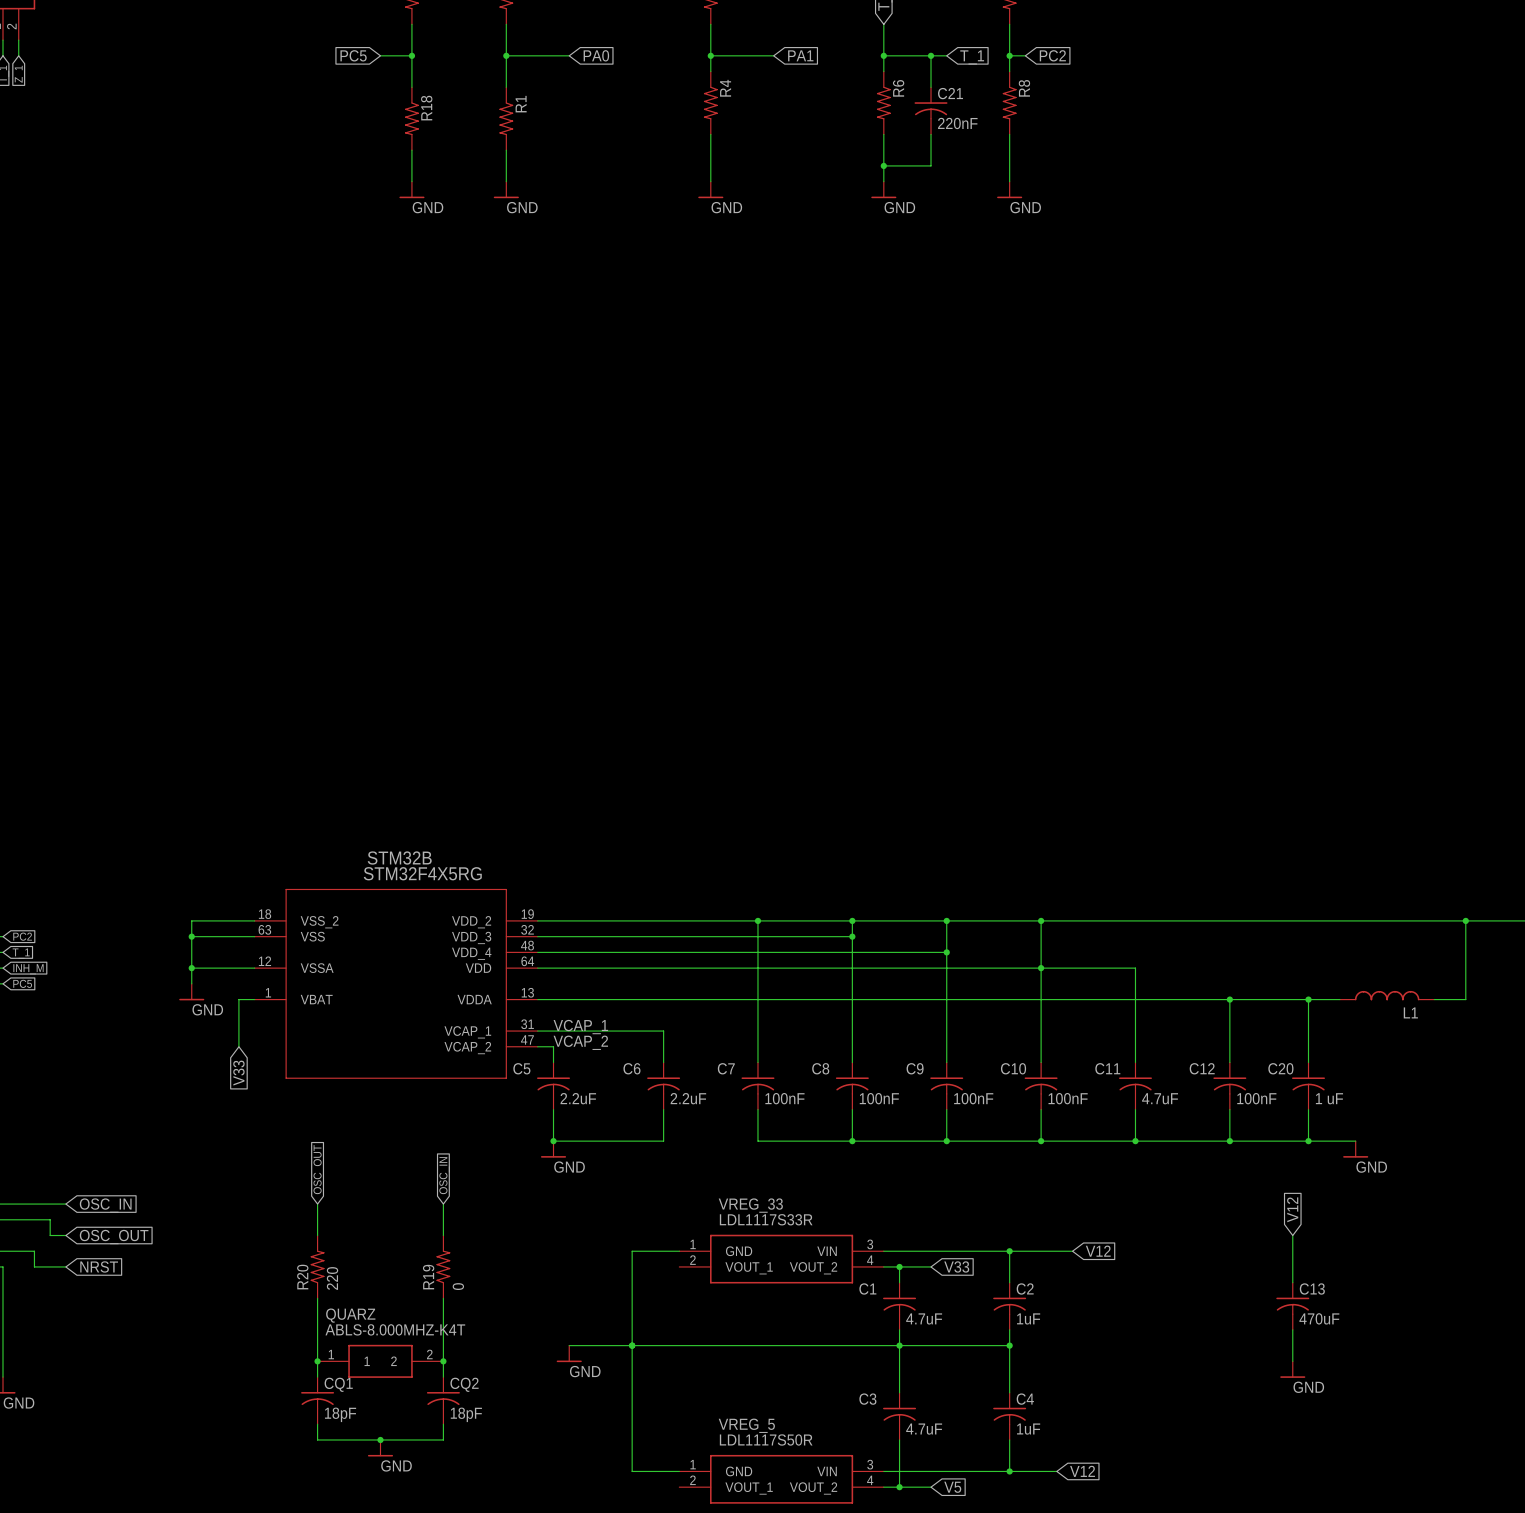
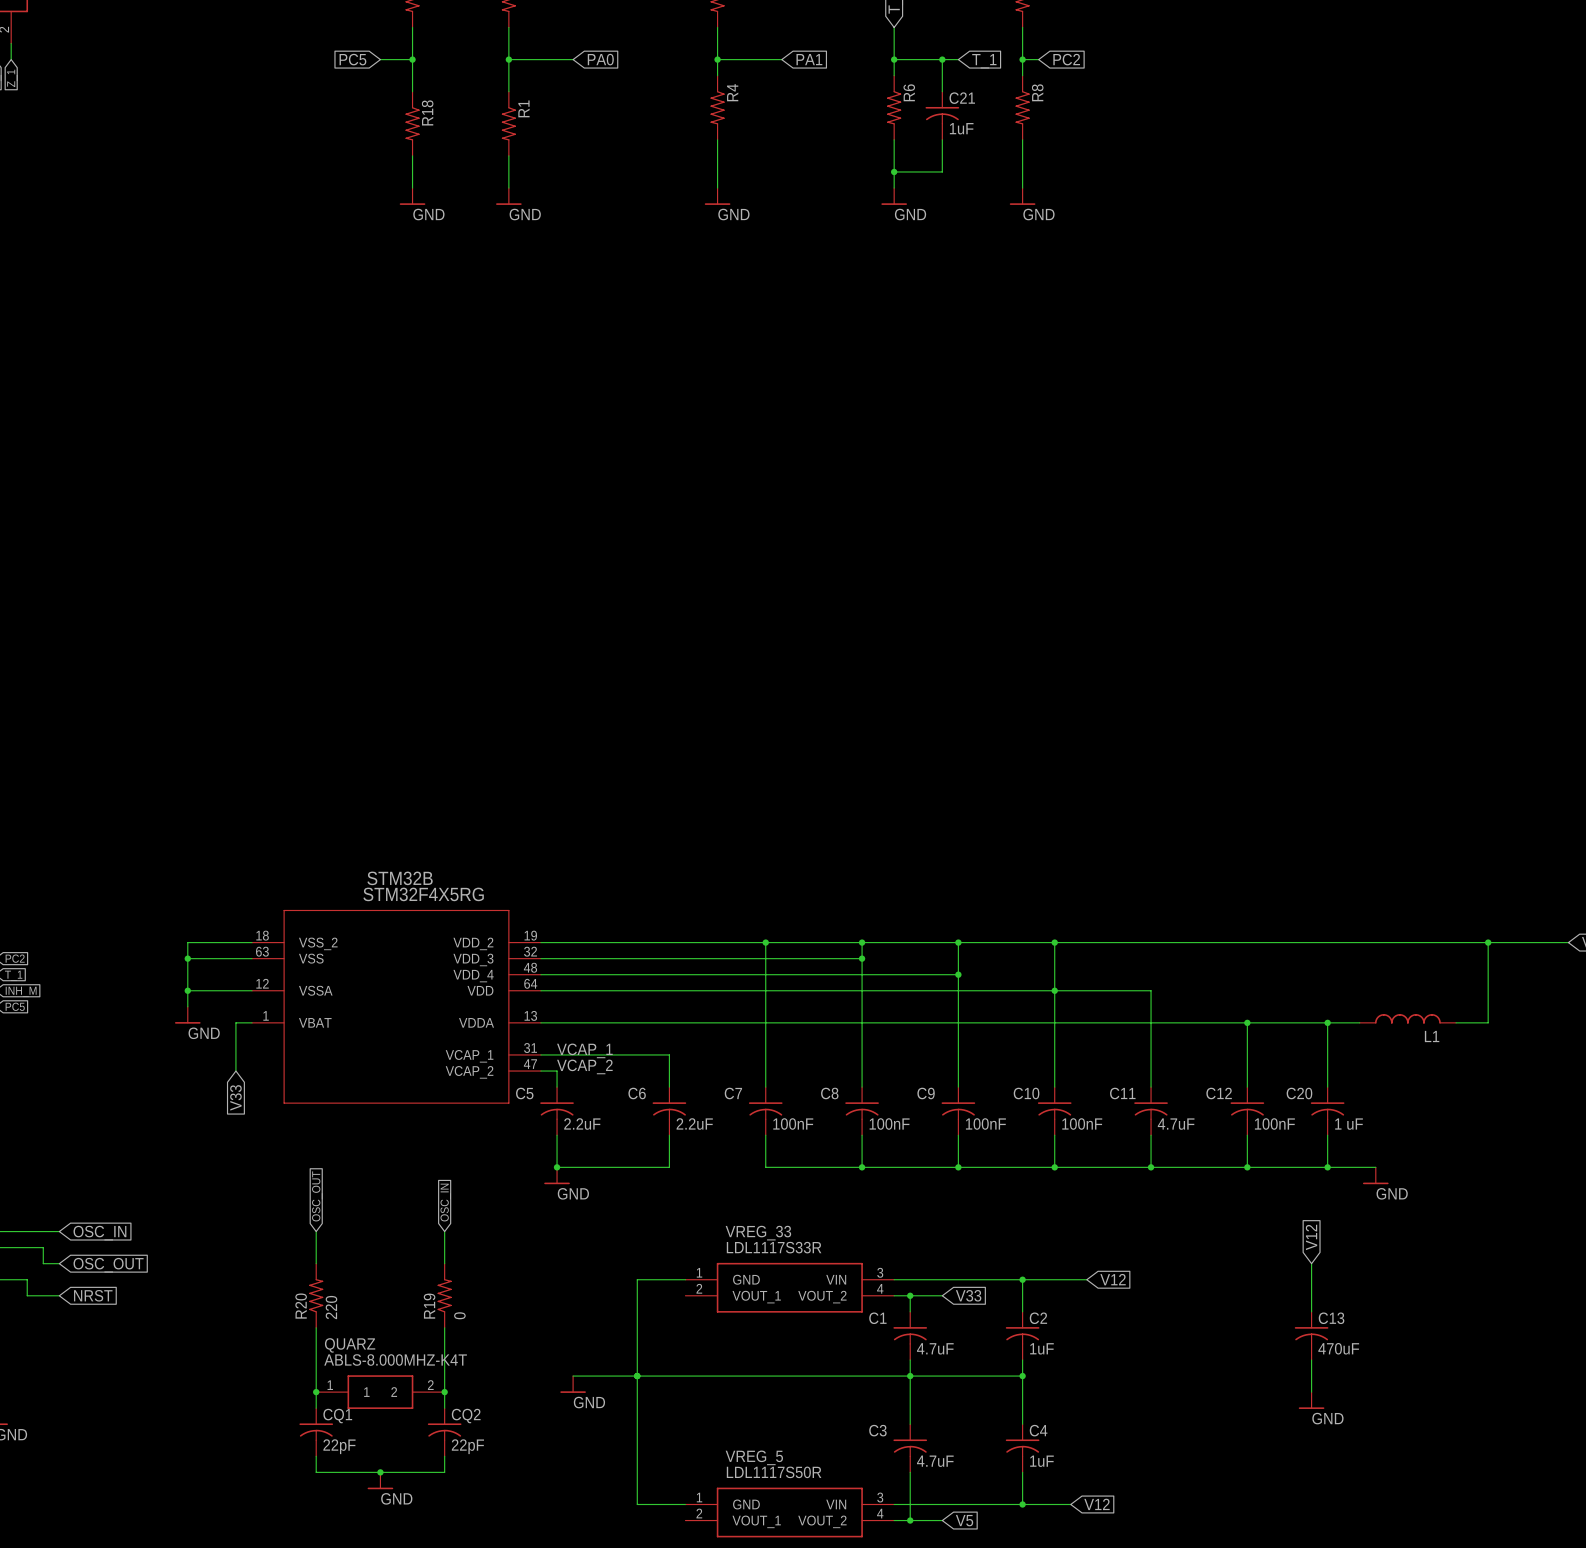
C21 value: 220nF (957, 123) -> 1uF (961, 128)
CQ1 value: 18pF (340, 1414) -> 22pF (339, 1446)
CQ2 value: 18pF (466, 1414) -> 22pF (467, 1446)

